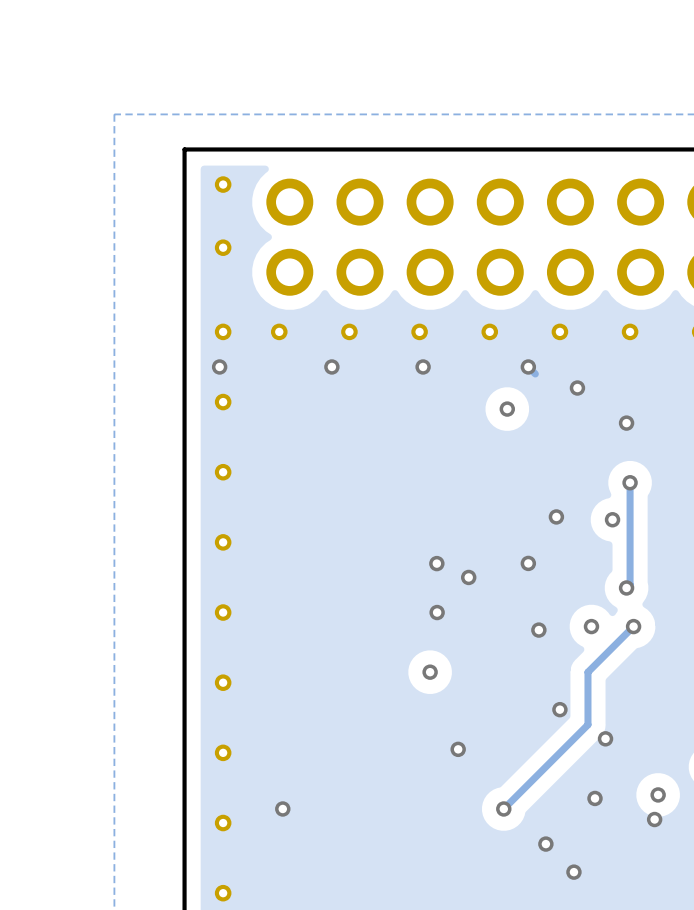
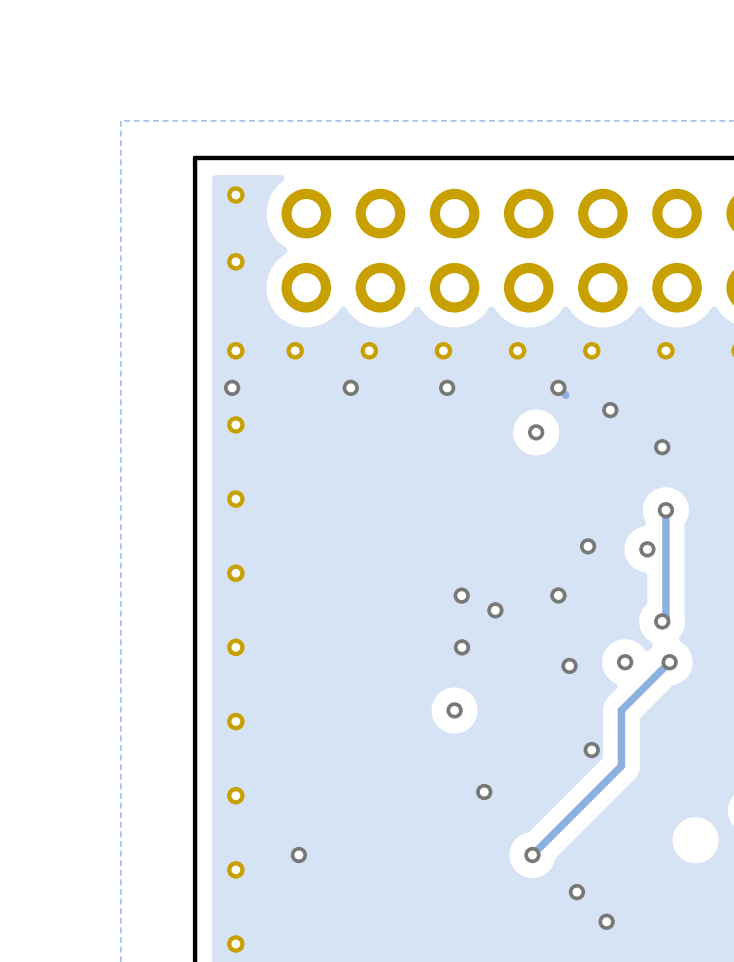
via: (605, 738) -> none
via: (658, 794) -> none
via: (594, 798) -> none
via: (654, 819) -> none

